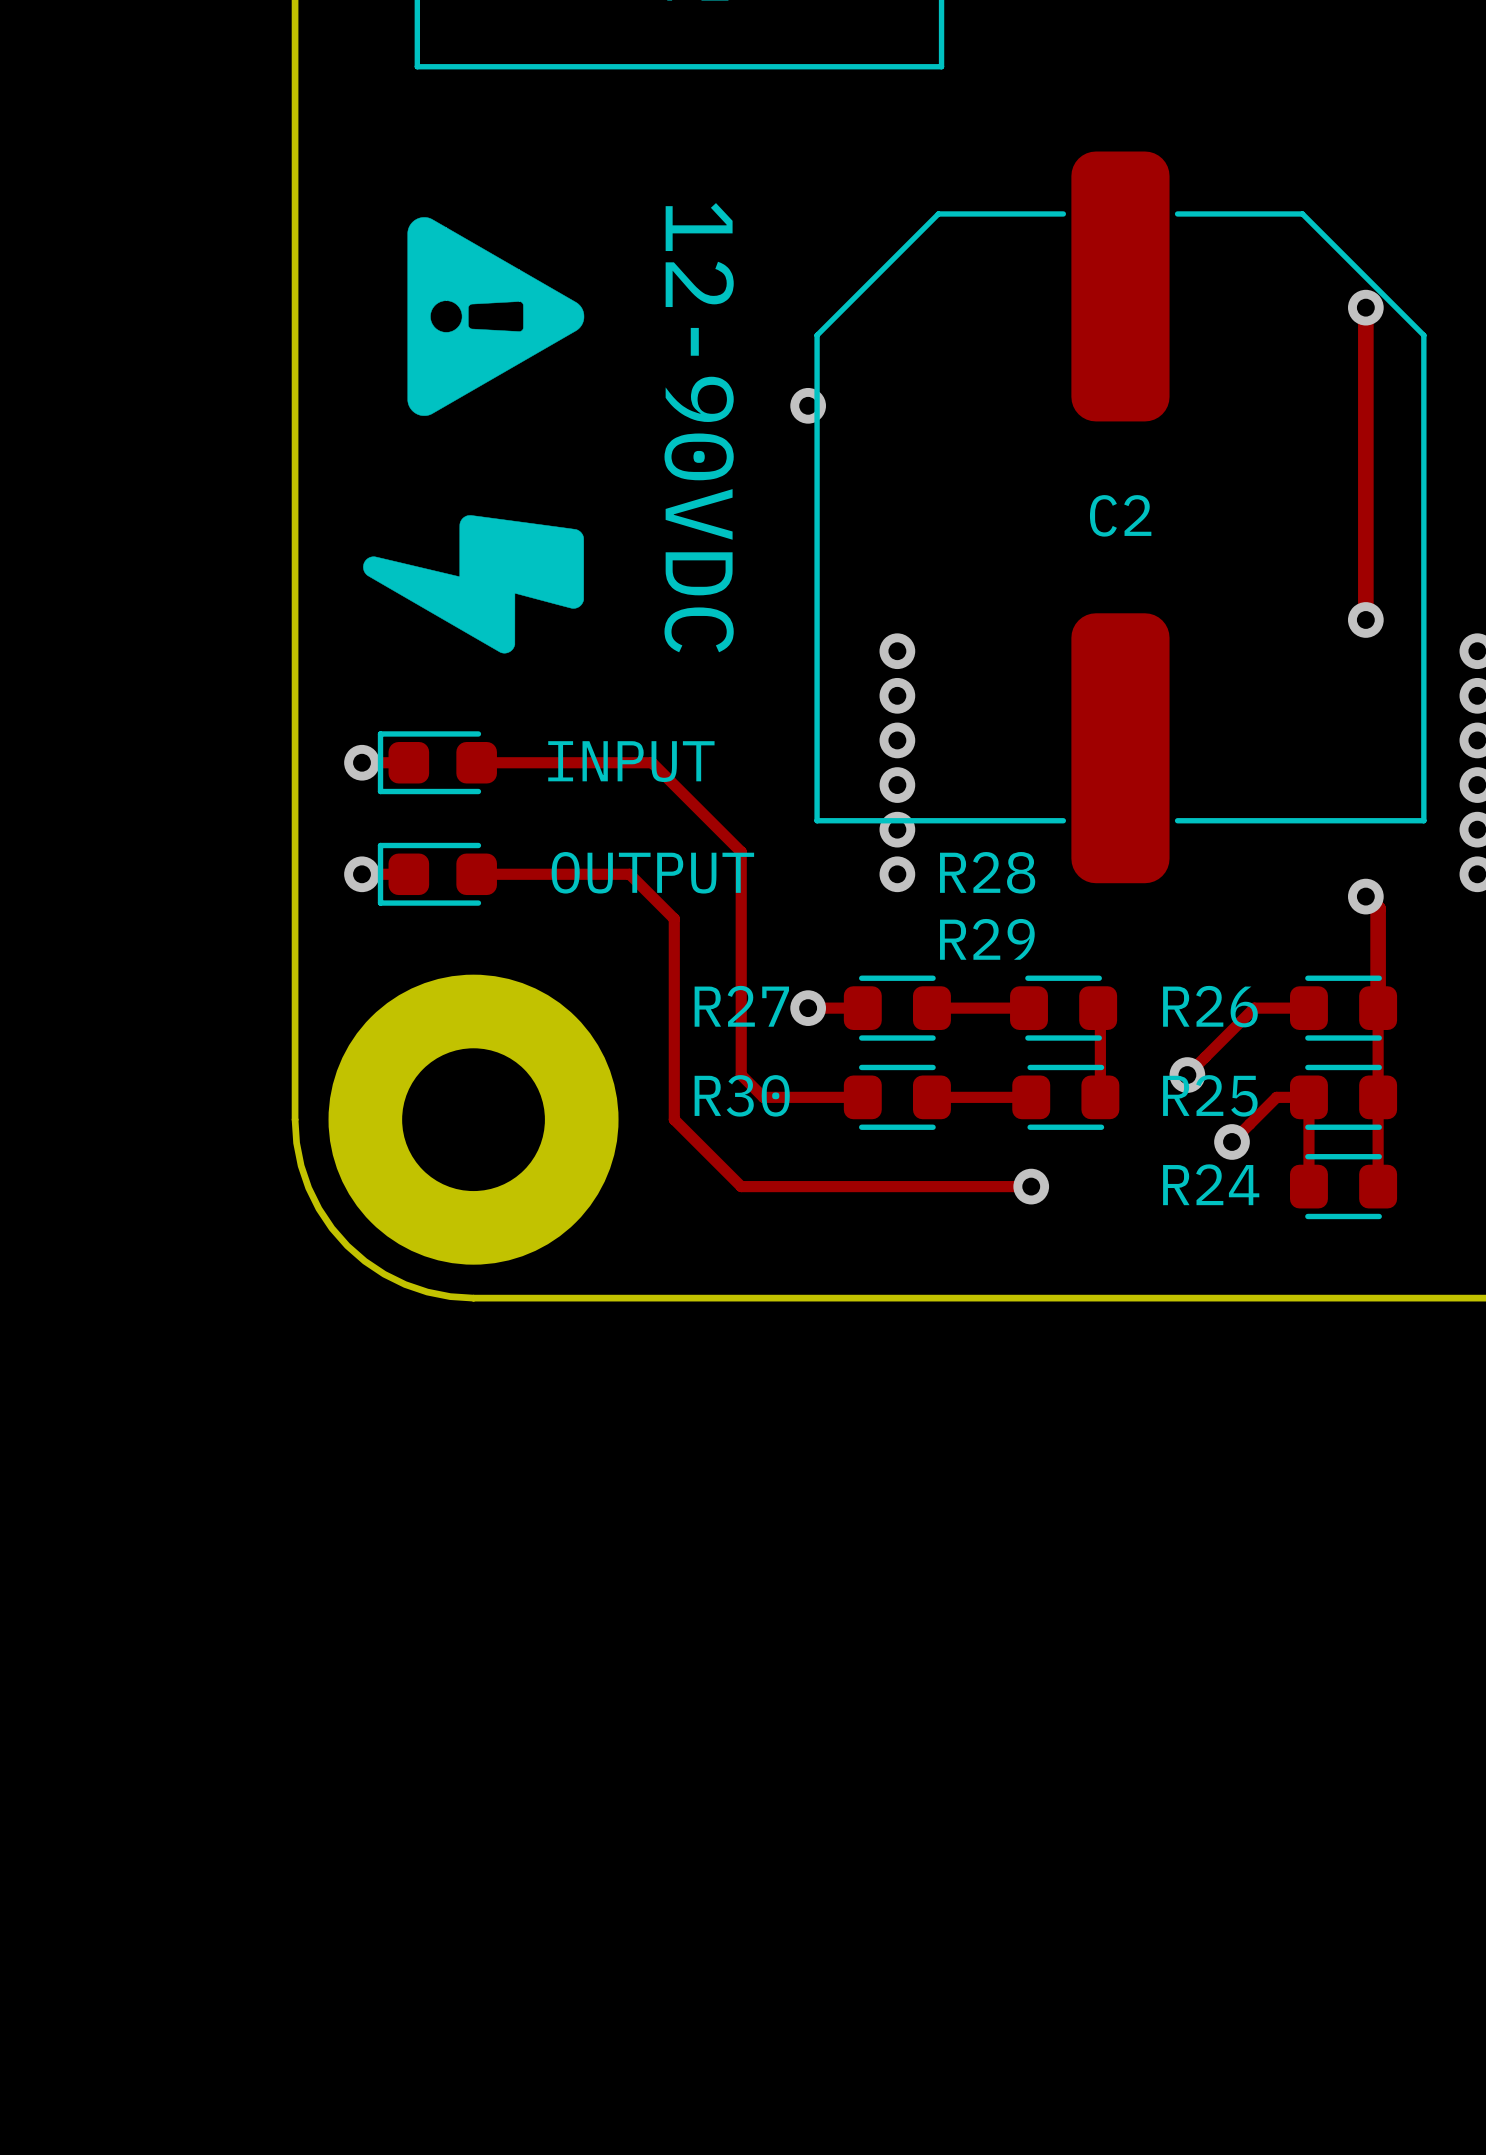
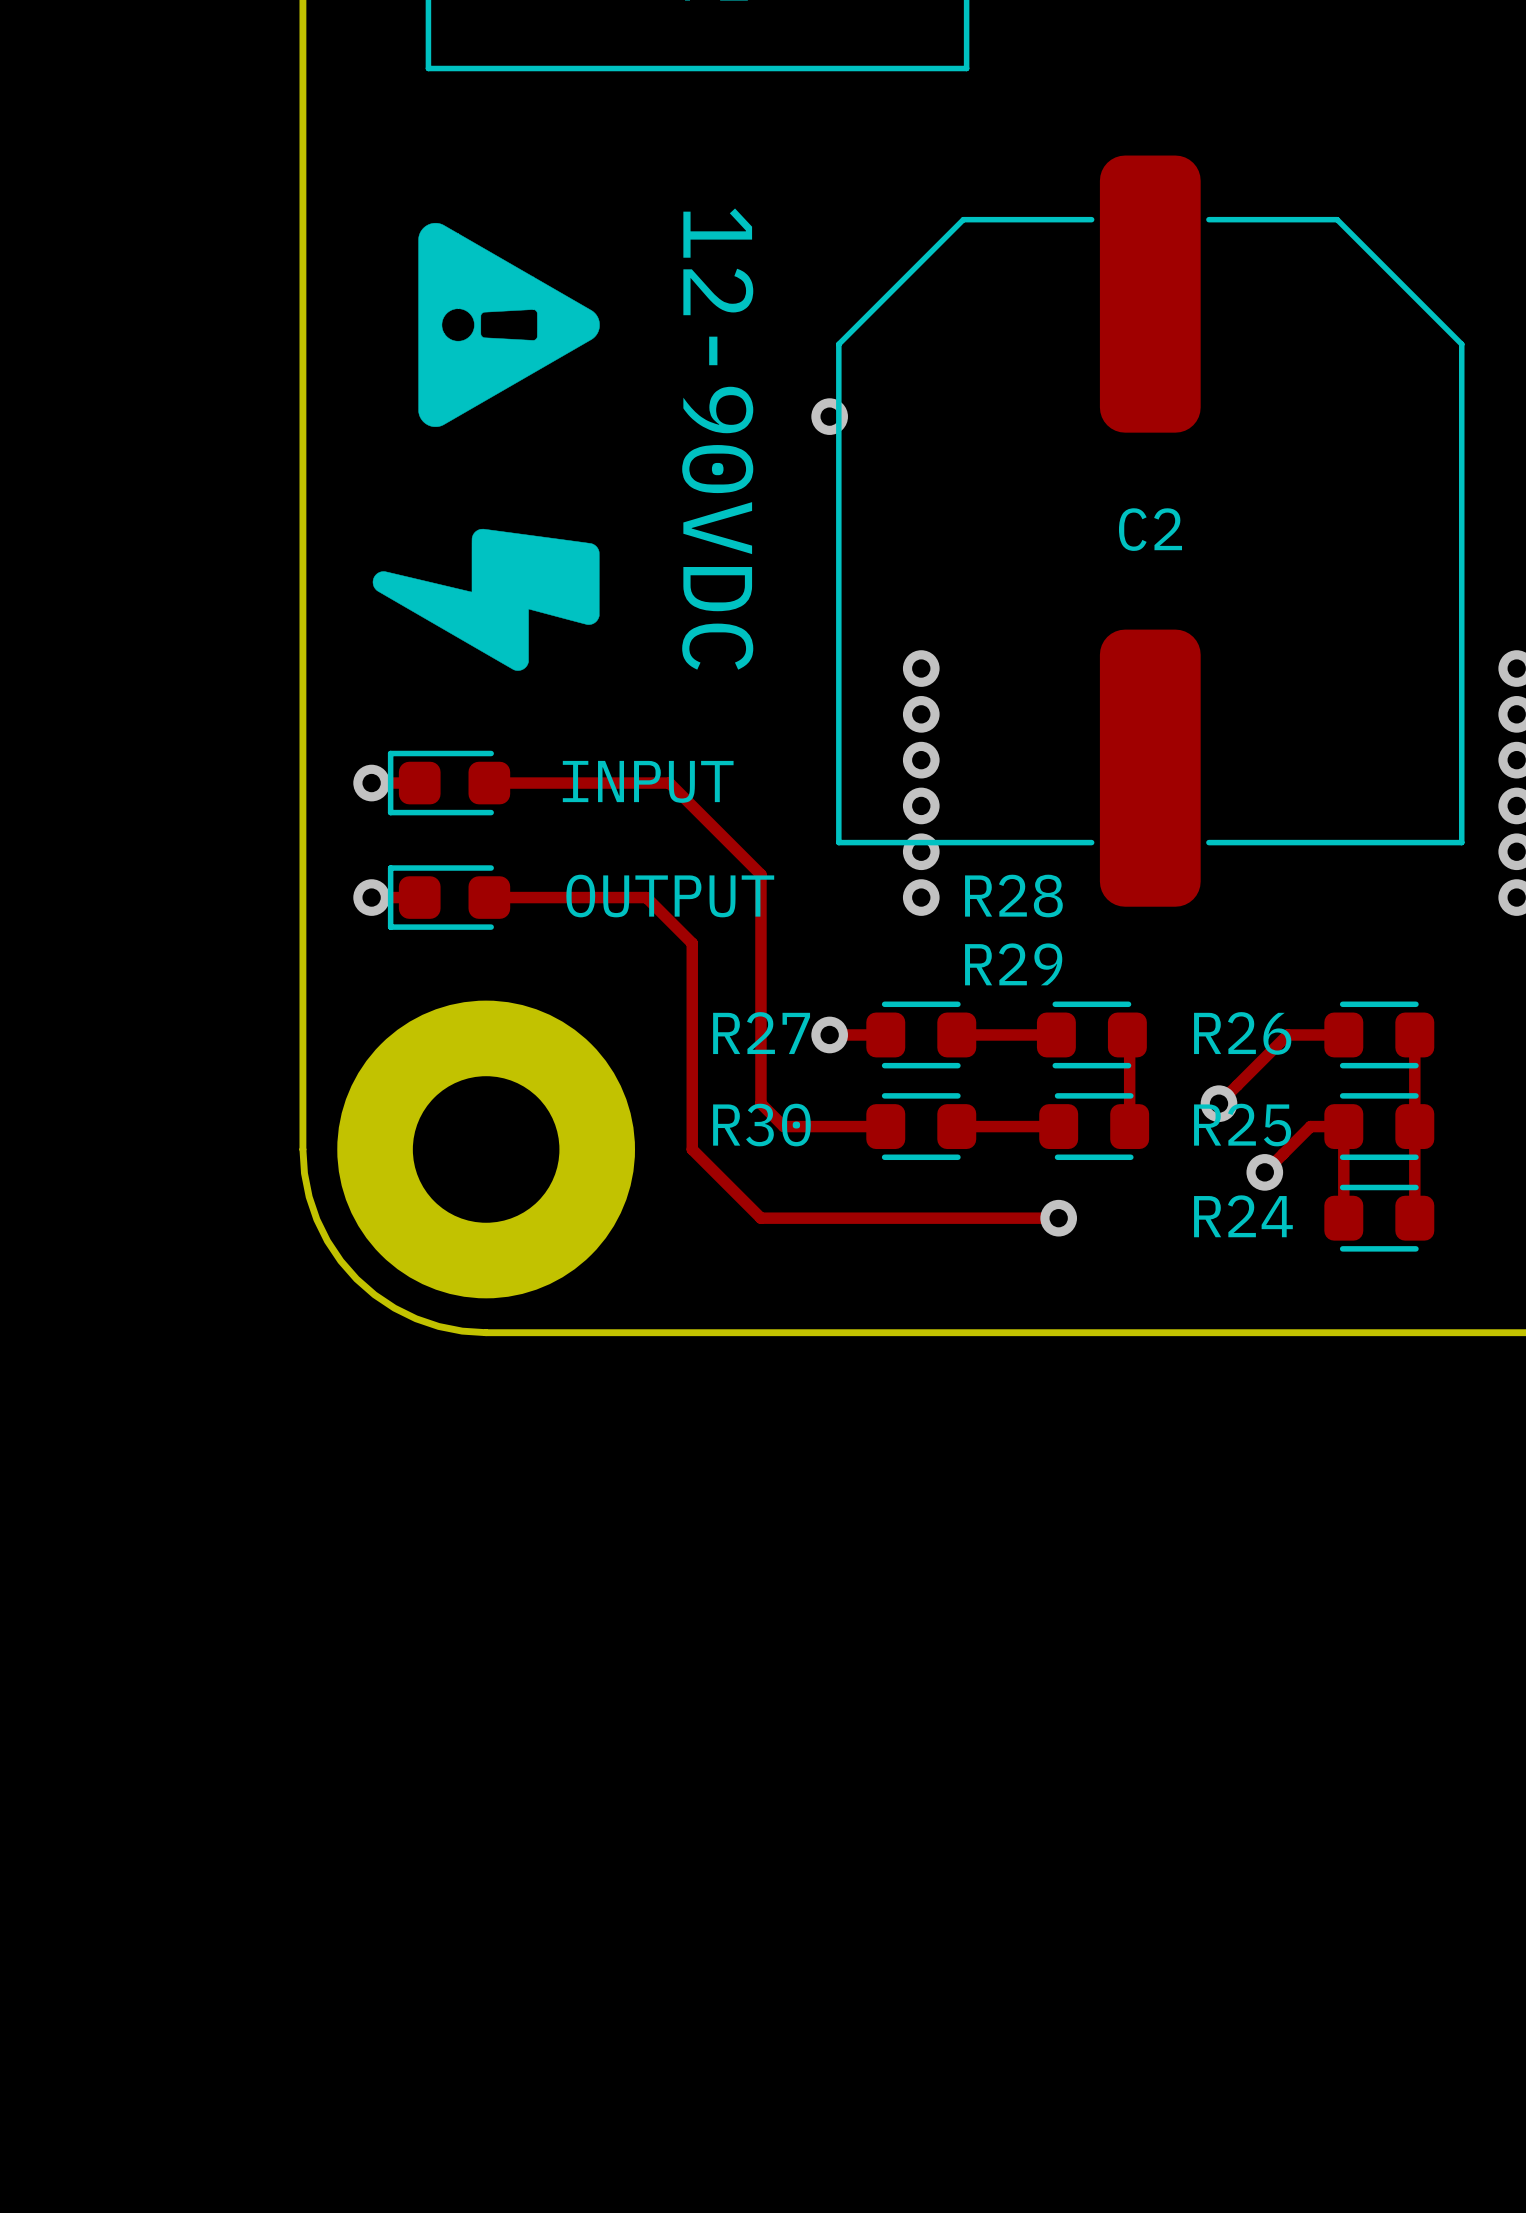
track: (1365, 307) (1365, 619) -> none
via: (1365, 307) -> none
via: (1365, 619) -> none
track: (1365, 896) (1378, 908) (1378, 1008) -> none
via: (1365, 896) -> none

